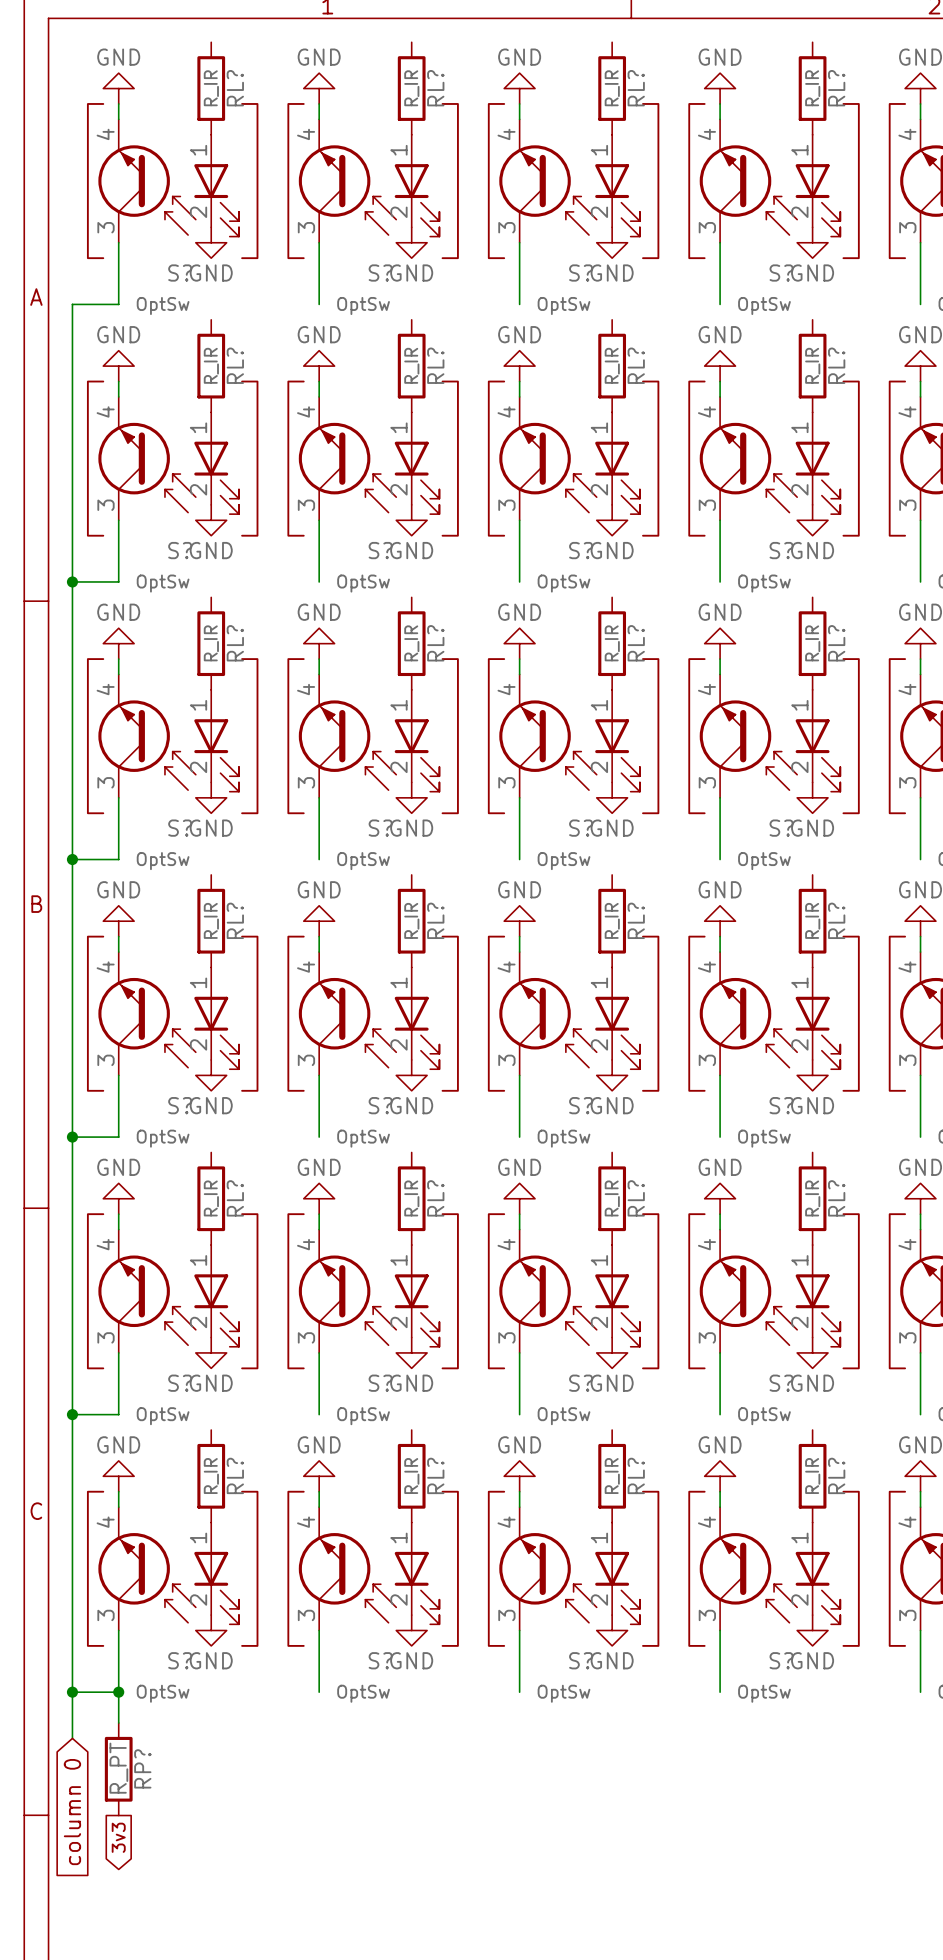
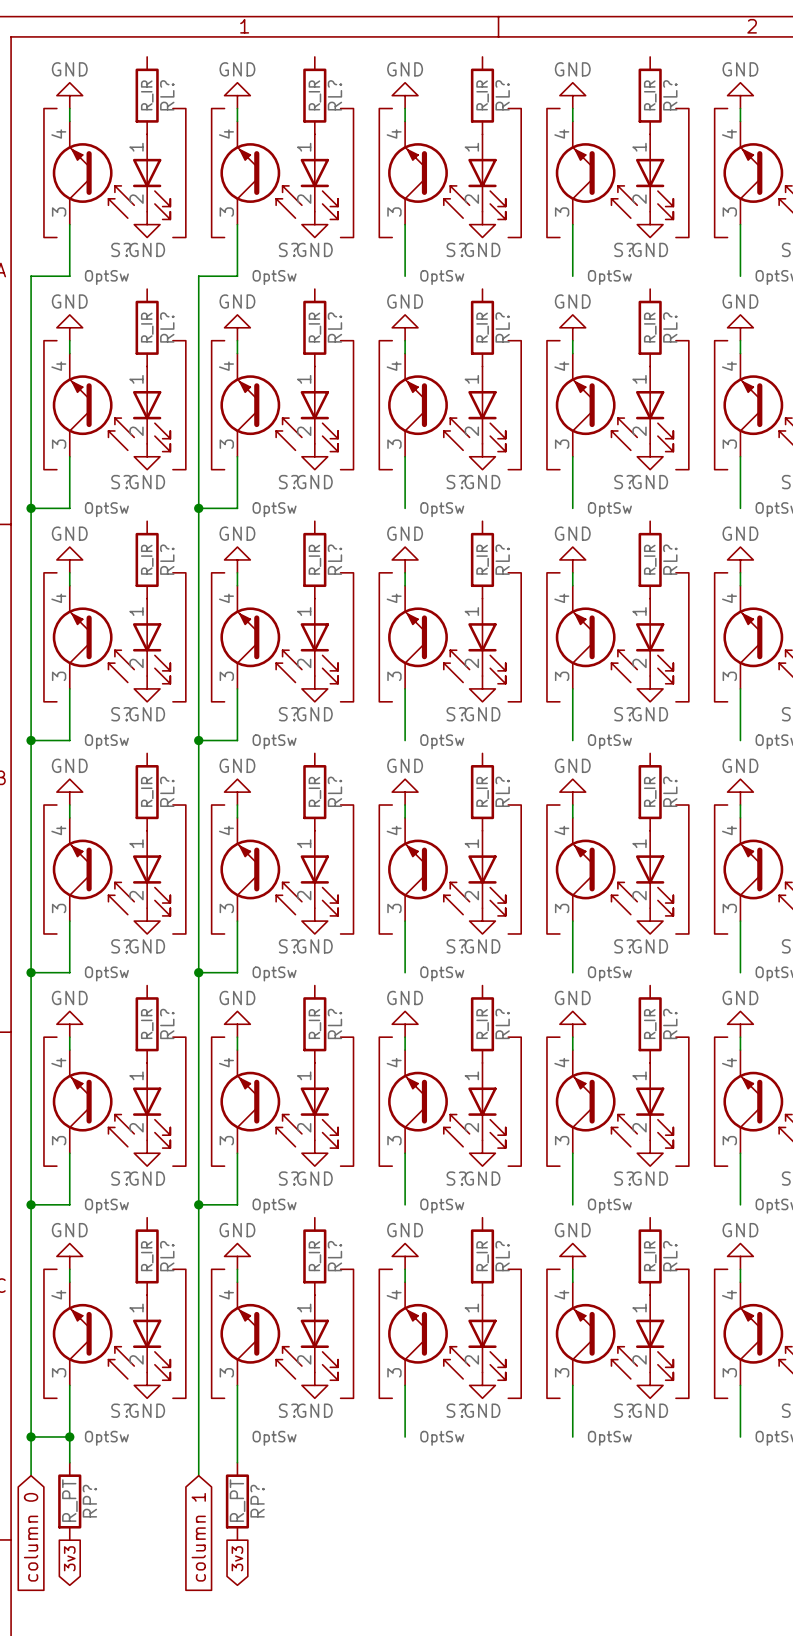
wire: none -> (237, 276) (198, 276) (198, 1475)
wire: none -> (198, 508) (237, 508)
junction: none -> (198, 508)
wire: none -> (198, 740) (237, 740)
junction: none -> (198, 740)
wire: none -> (198, 972) (237, 972)
junction: none -> (198, 972)
wire: none -> (198, 1204) (237, 1204)
junction: none -> (198, 1204)
wire: none -> (237, 1436) (237, 1462)
RP?: none -> R_PT (237, 1501)
global label: none -> column 1 (198, 1537)
global label: none -> 3v3 (237, 1558)

